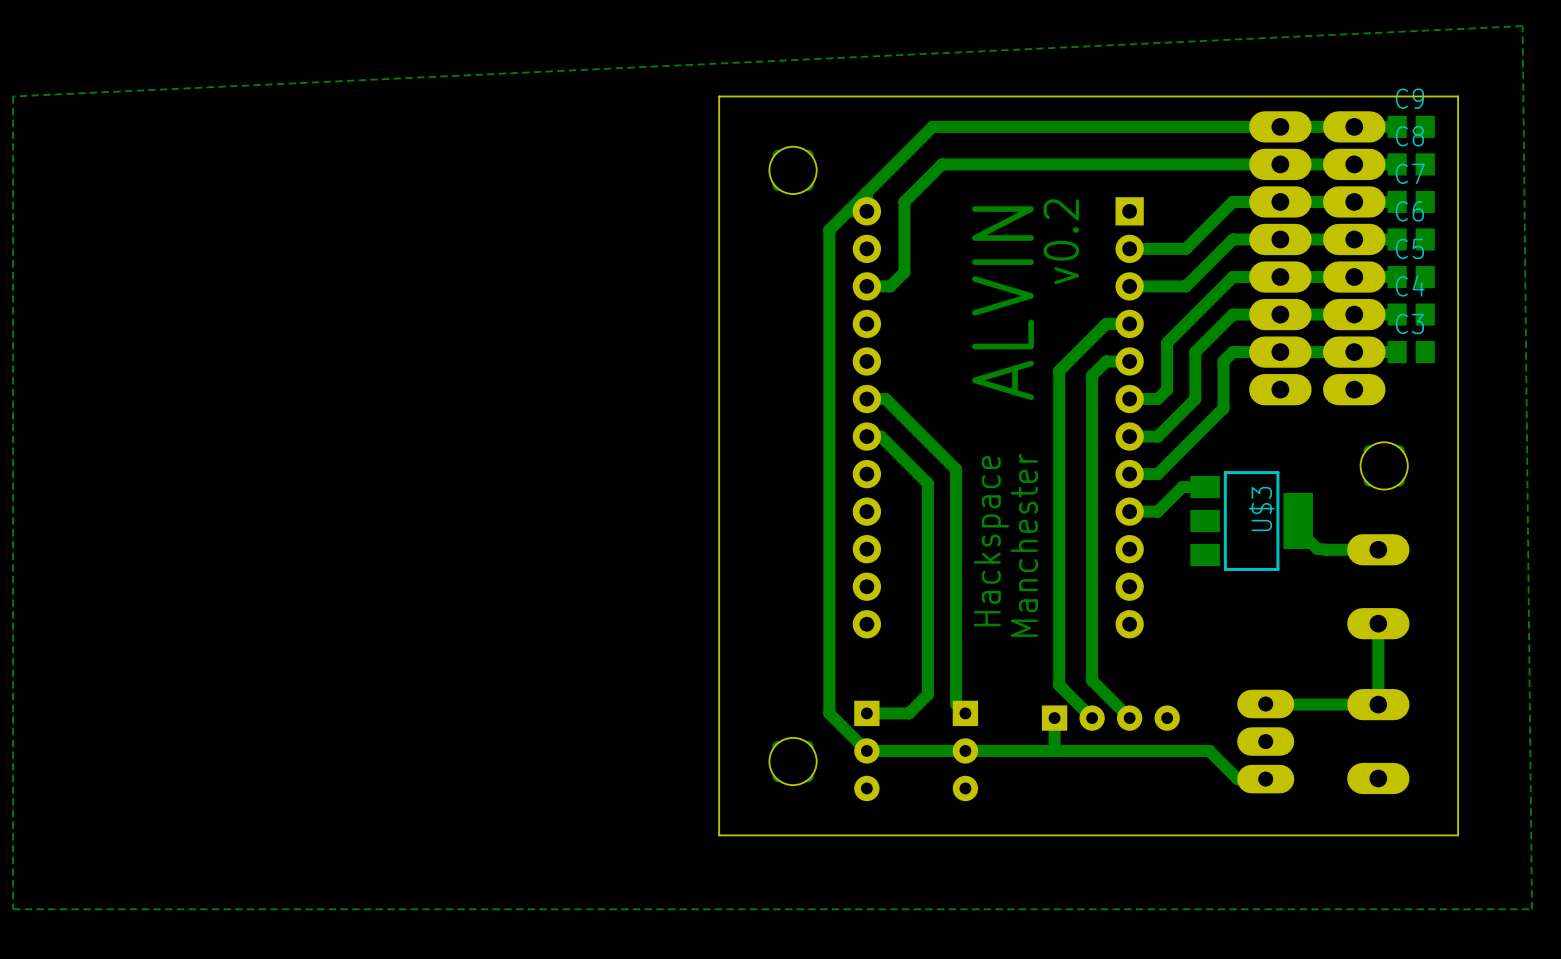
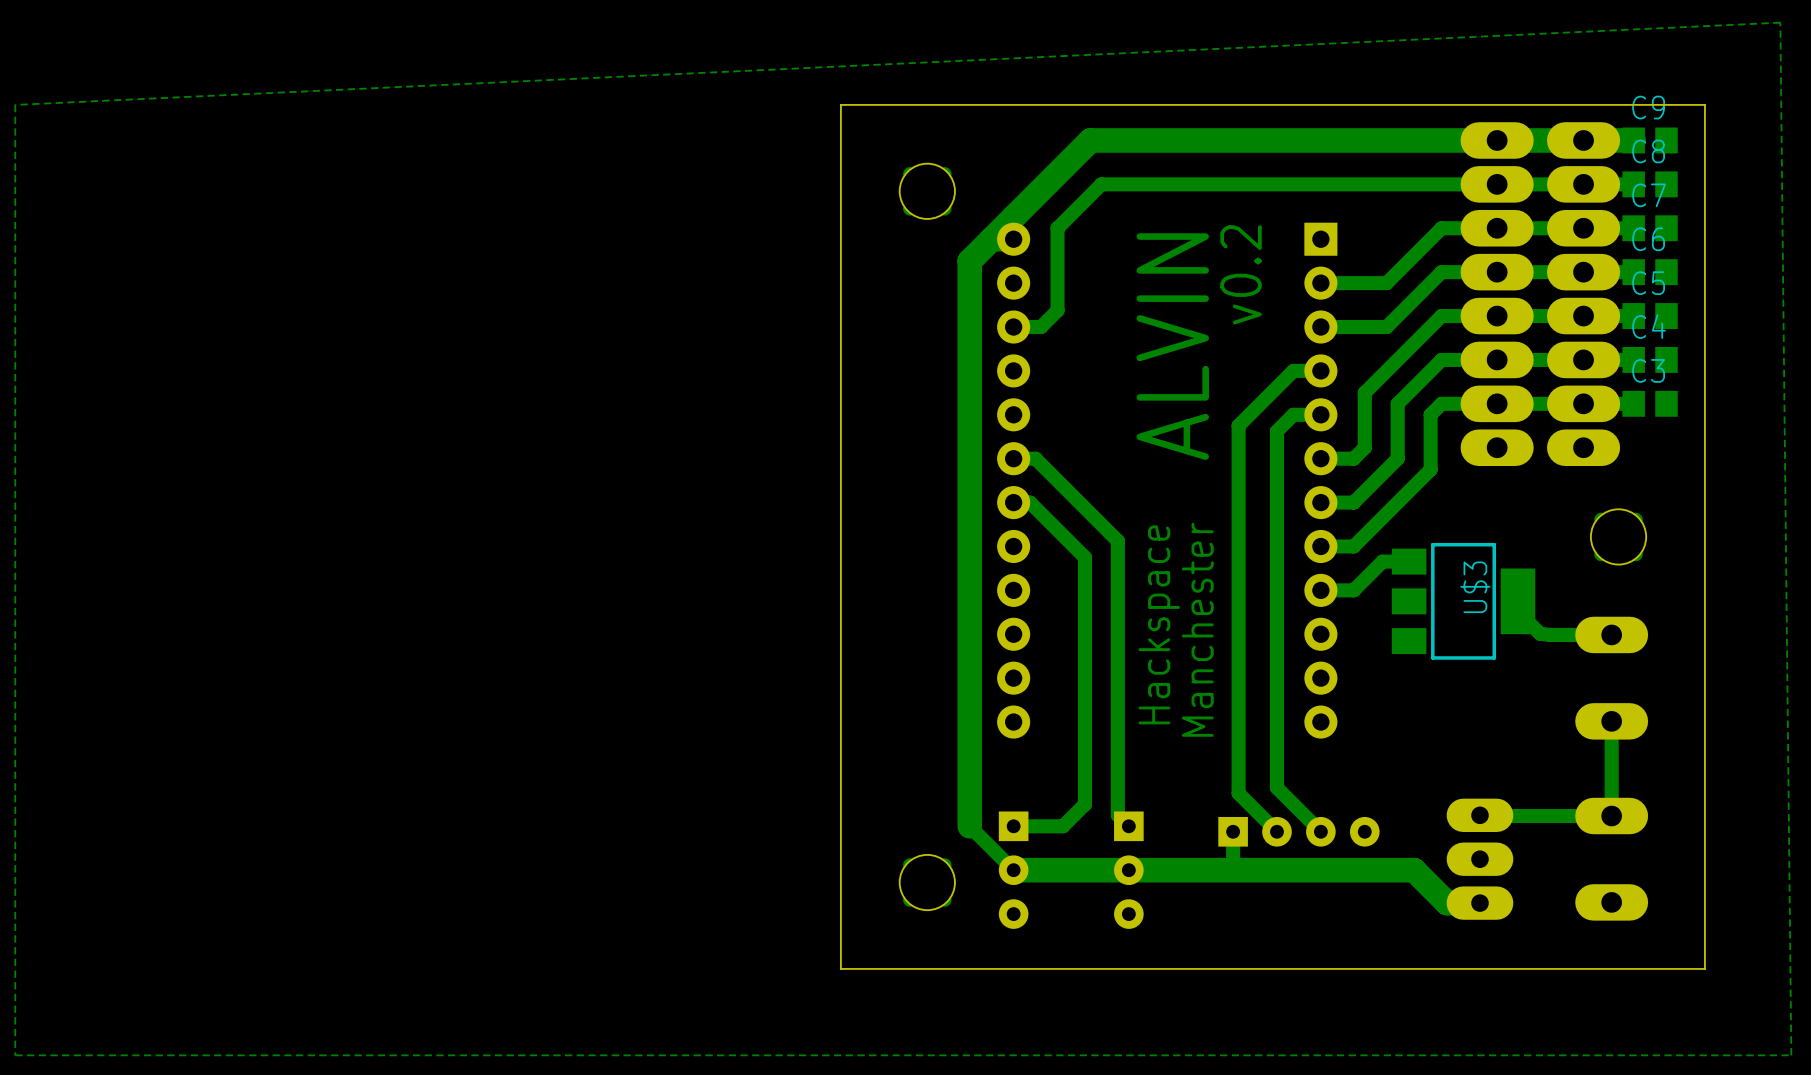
bottom track width: thin (1397, 126) (932, 126) (829, 230) (829, 713) -> thick (1633, 140) (1090, 140) (969, 261) (969, 826)
bottom track width: thin (866, 750) (1209, 750) (1237, 779) (1265, 779) -> thick (1013, 870) (1414, 870) (1447, 903) (1480, 903)

